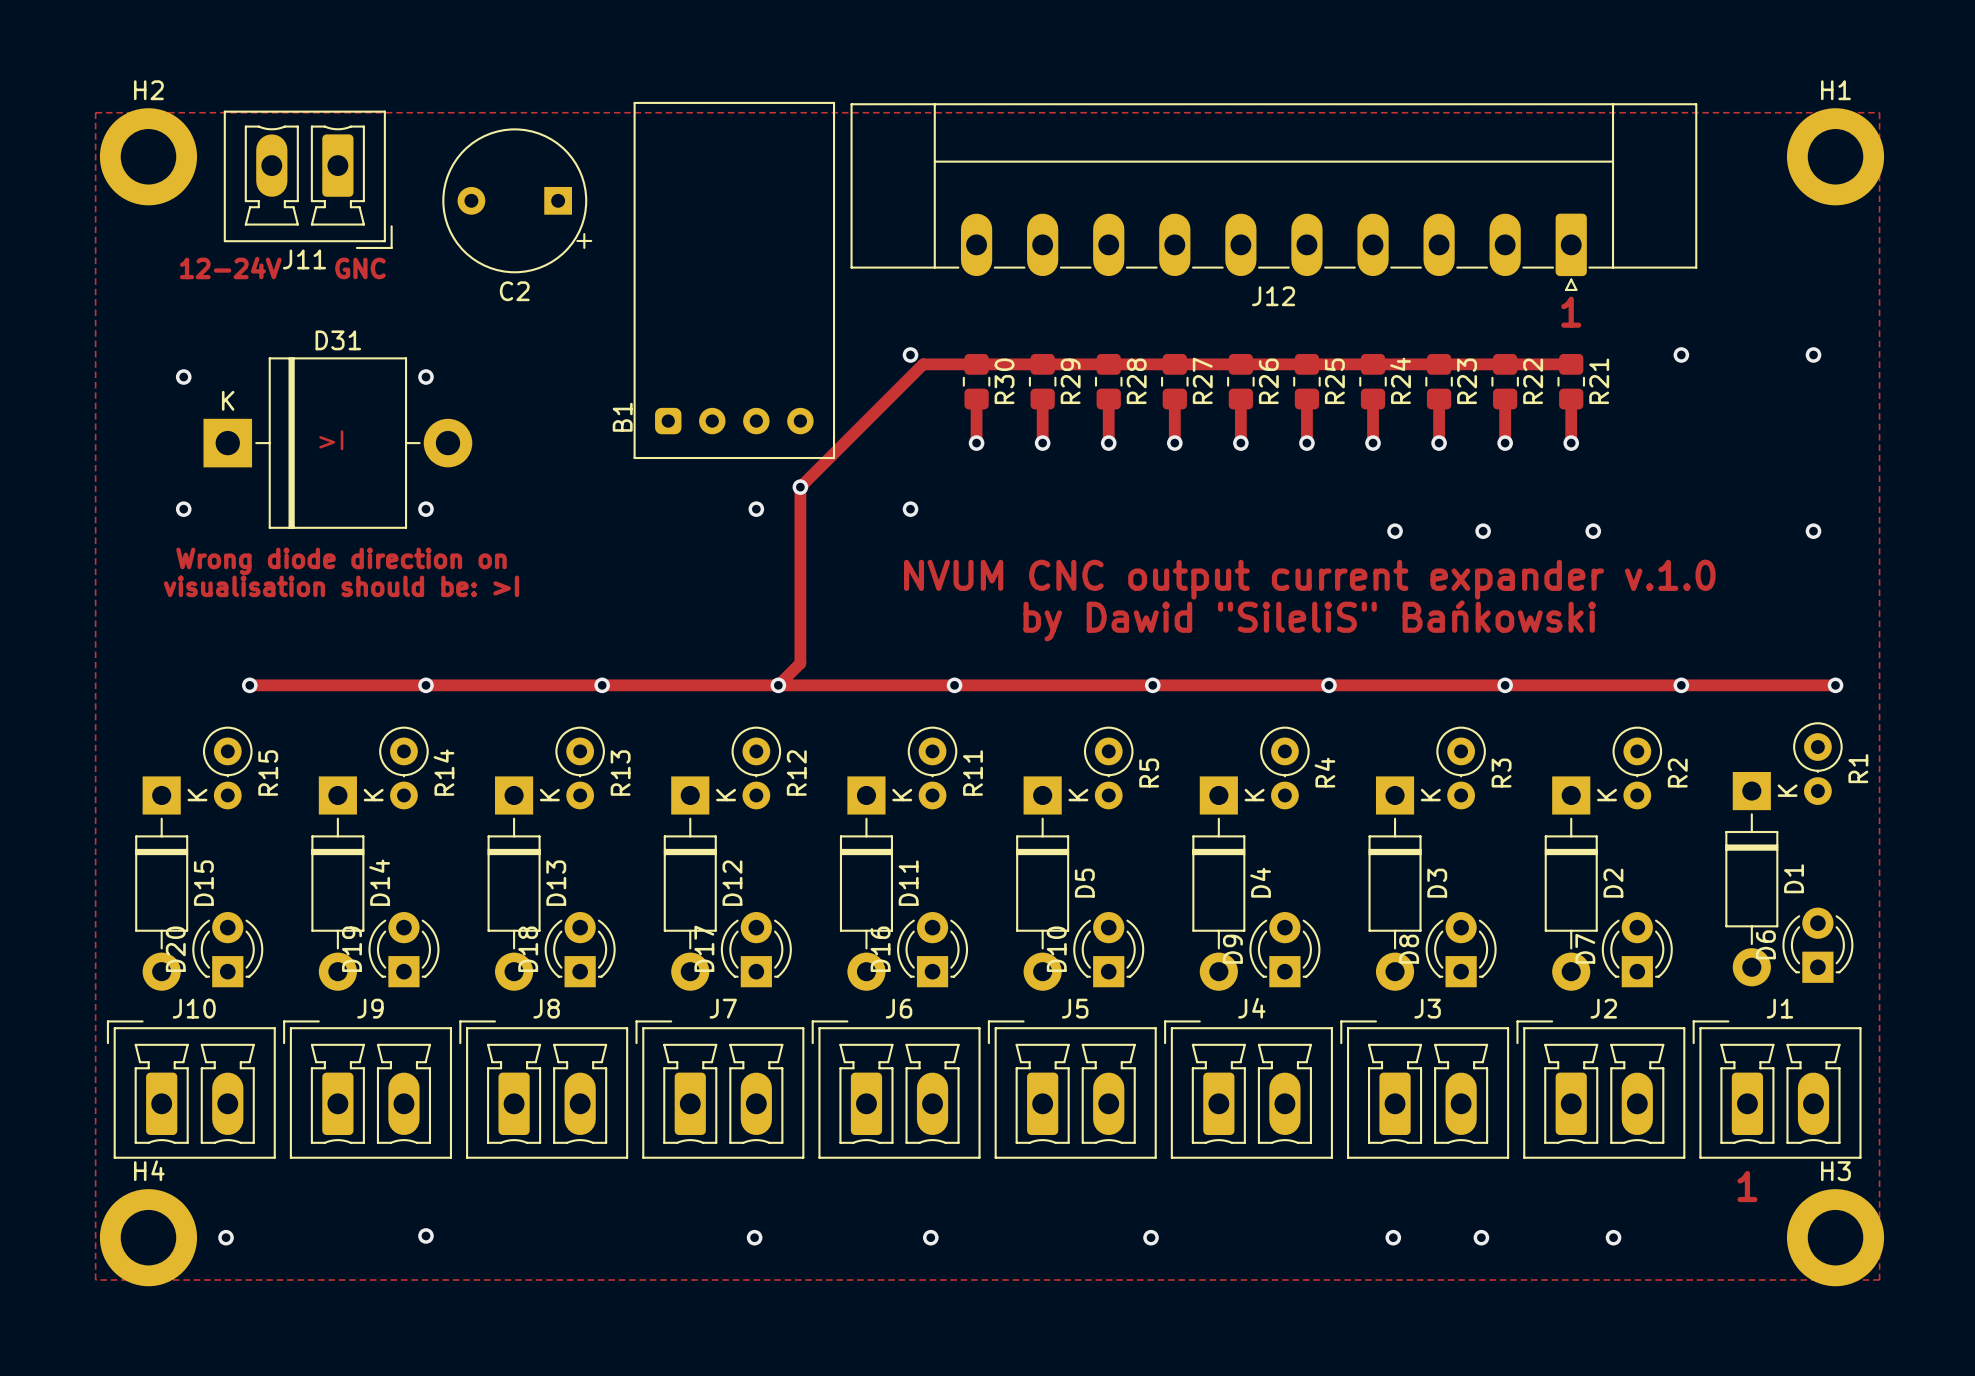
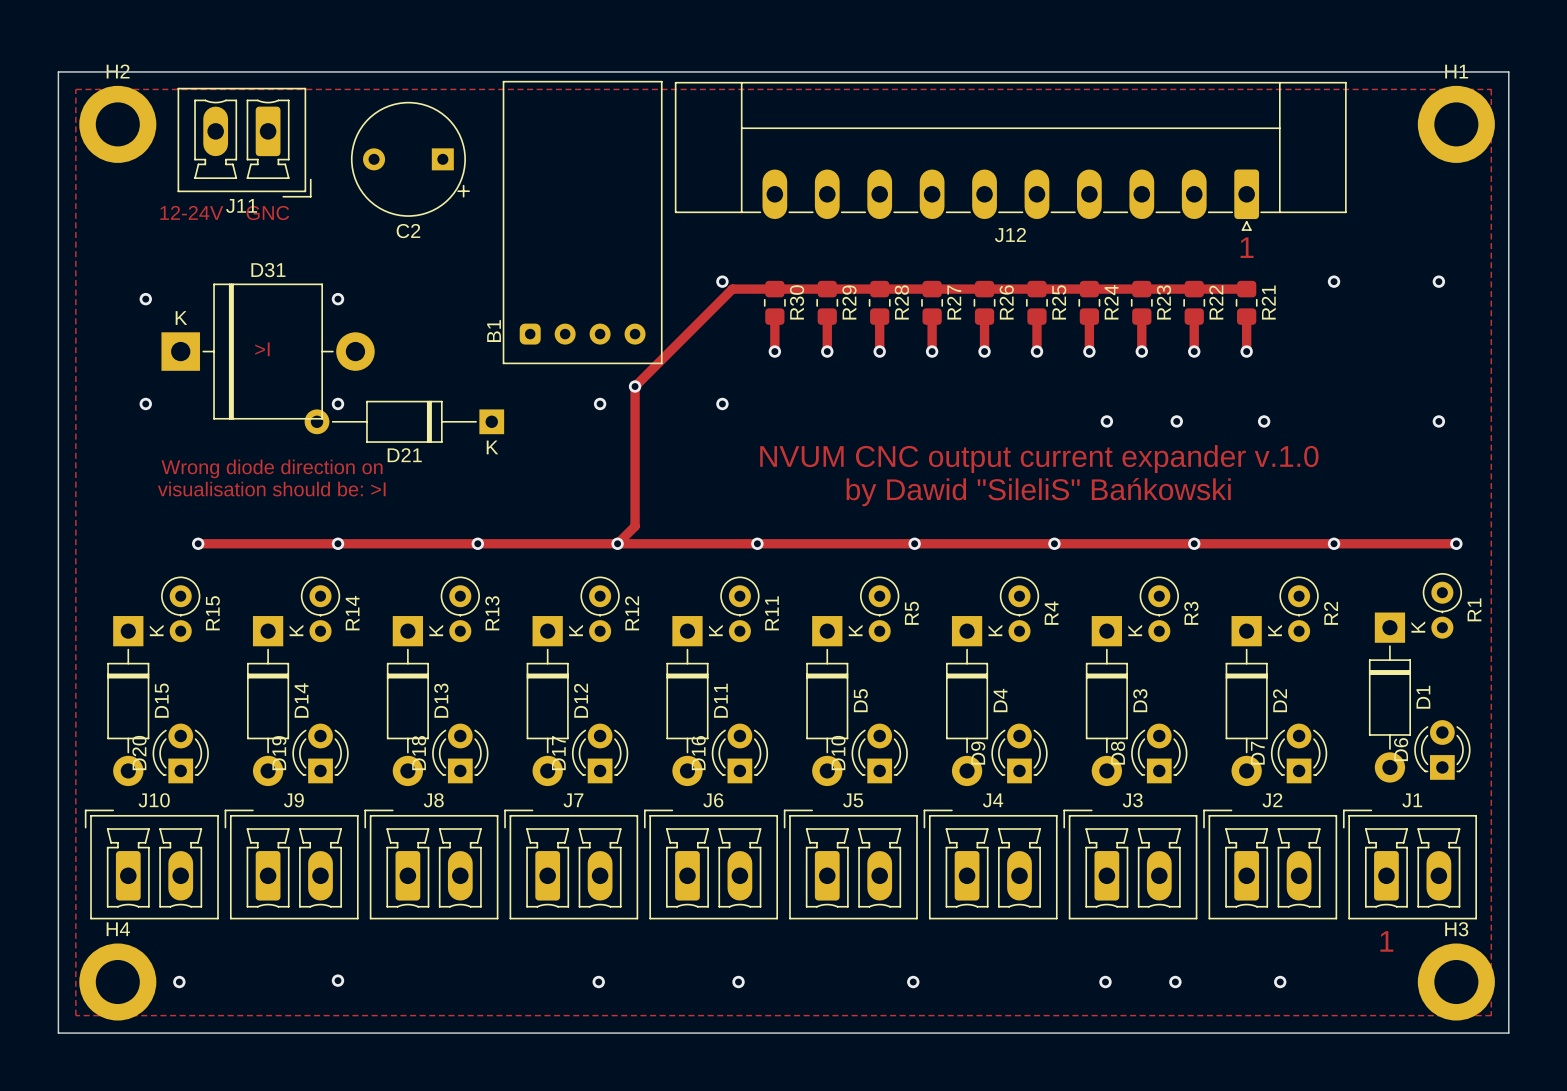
board edge: none -> (58, 71) (58, 1033) (1508, 1033) (1508, 71) (58, 71)
D21: none -> (404, 421)
text: Wrong diode direction on (341, 561) -> none
text: visualisation should be: >I (341, 586) -> Wrong diode direction on (272, 468)
text: none -> visualisation should be: >I (271, 489)

